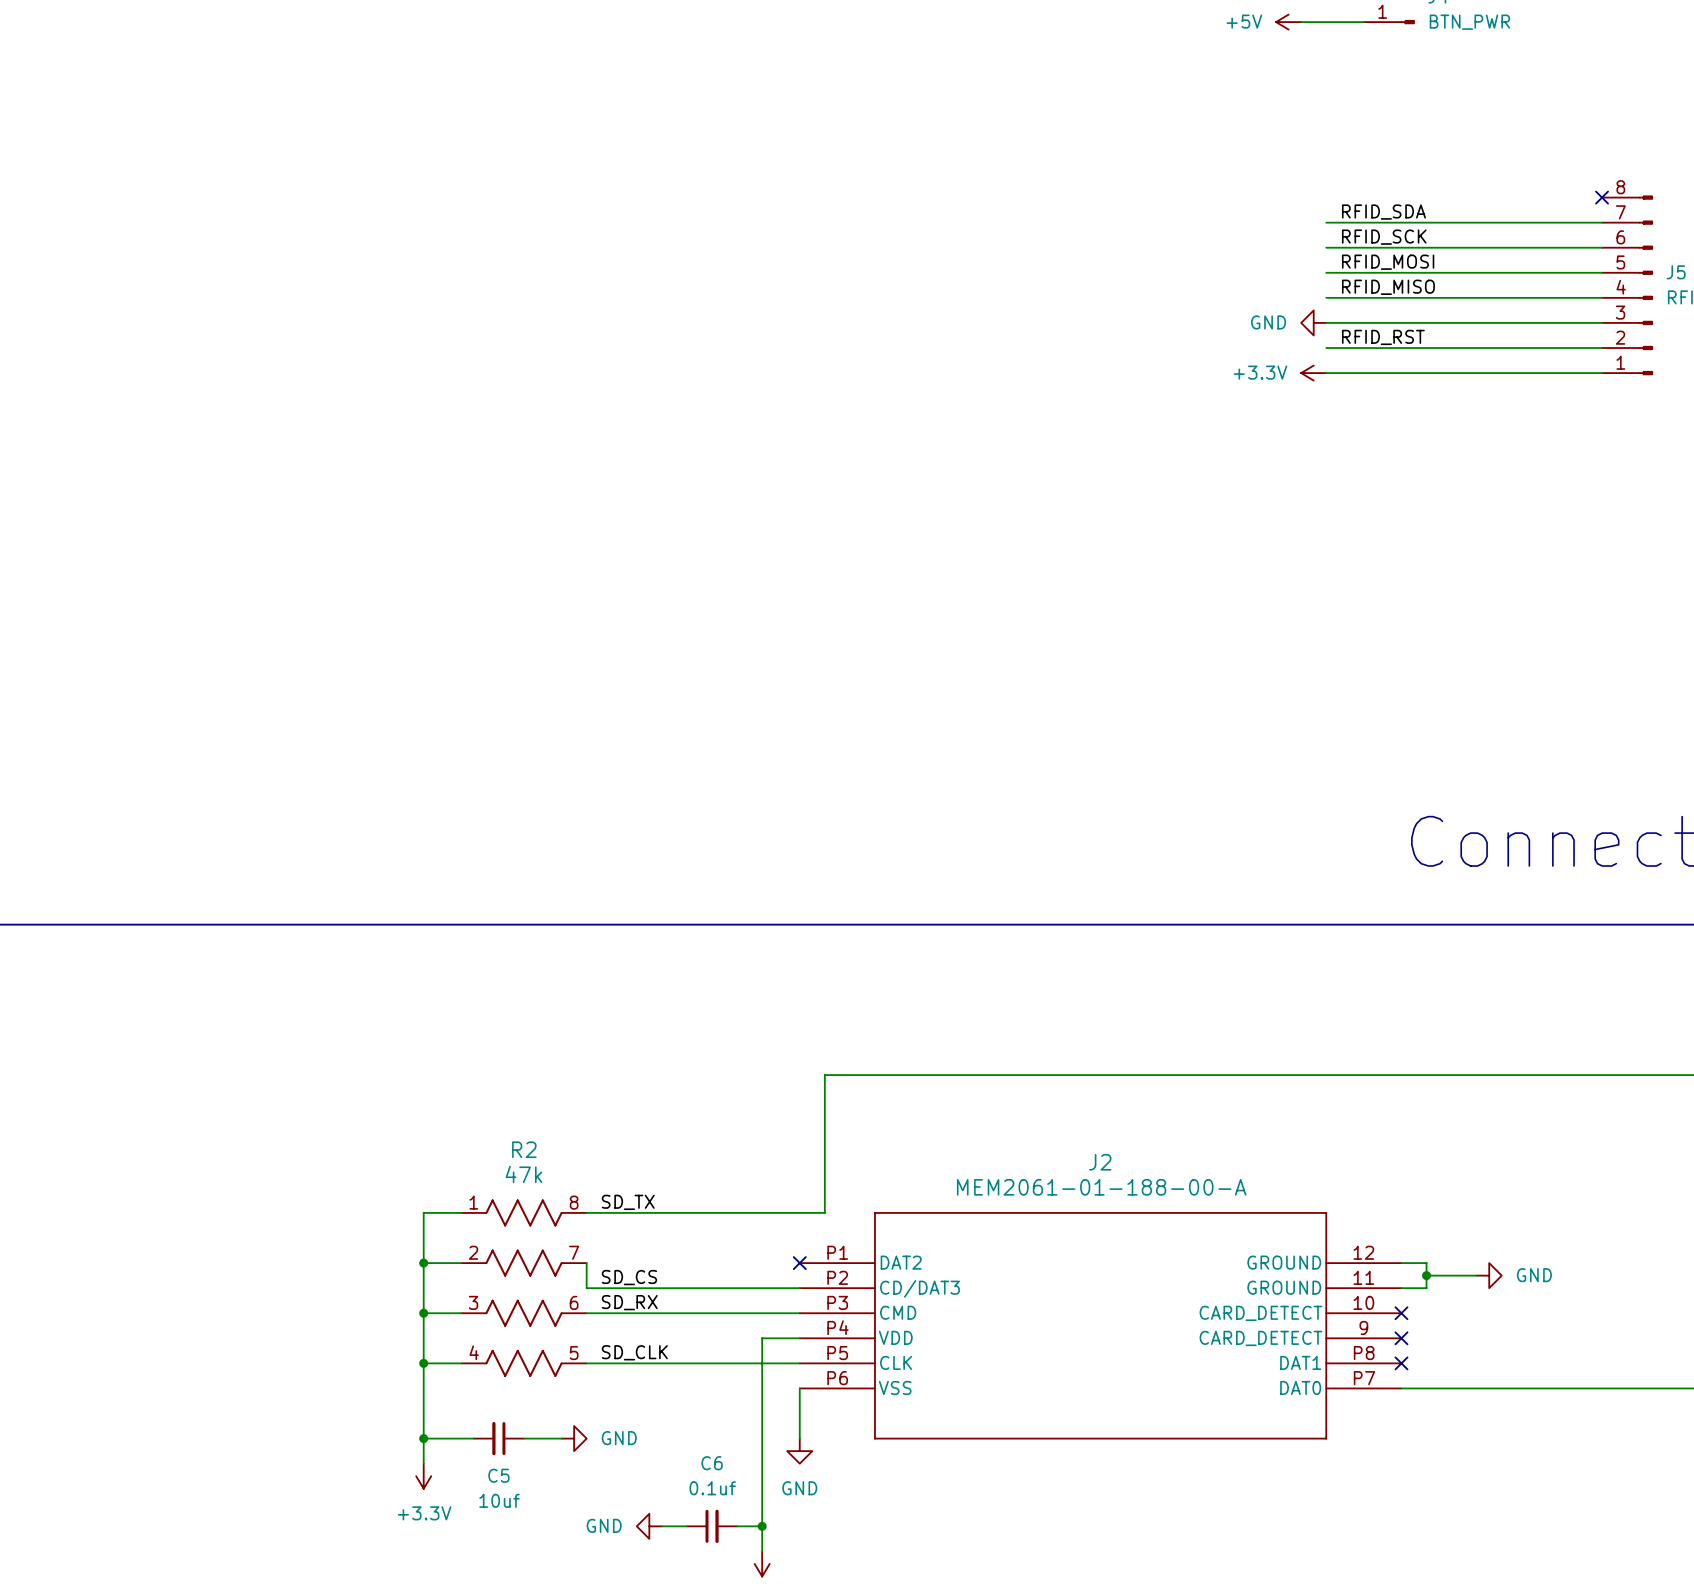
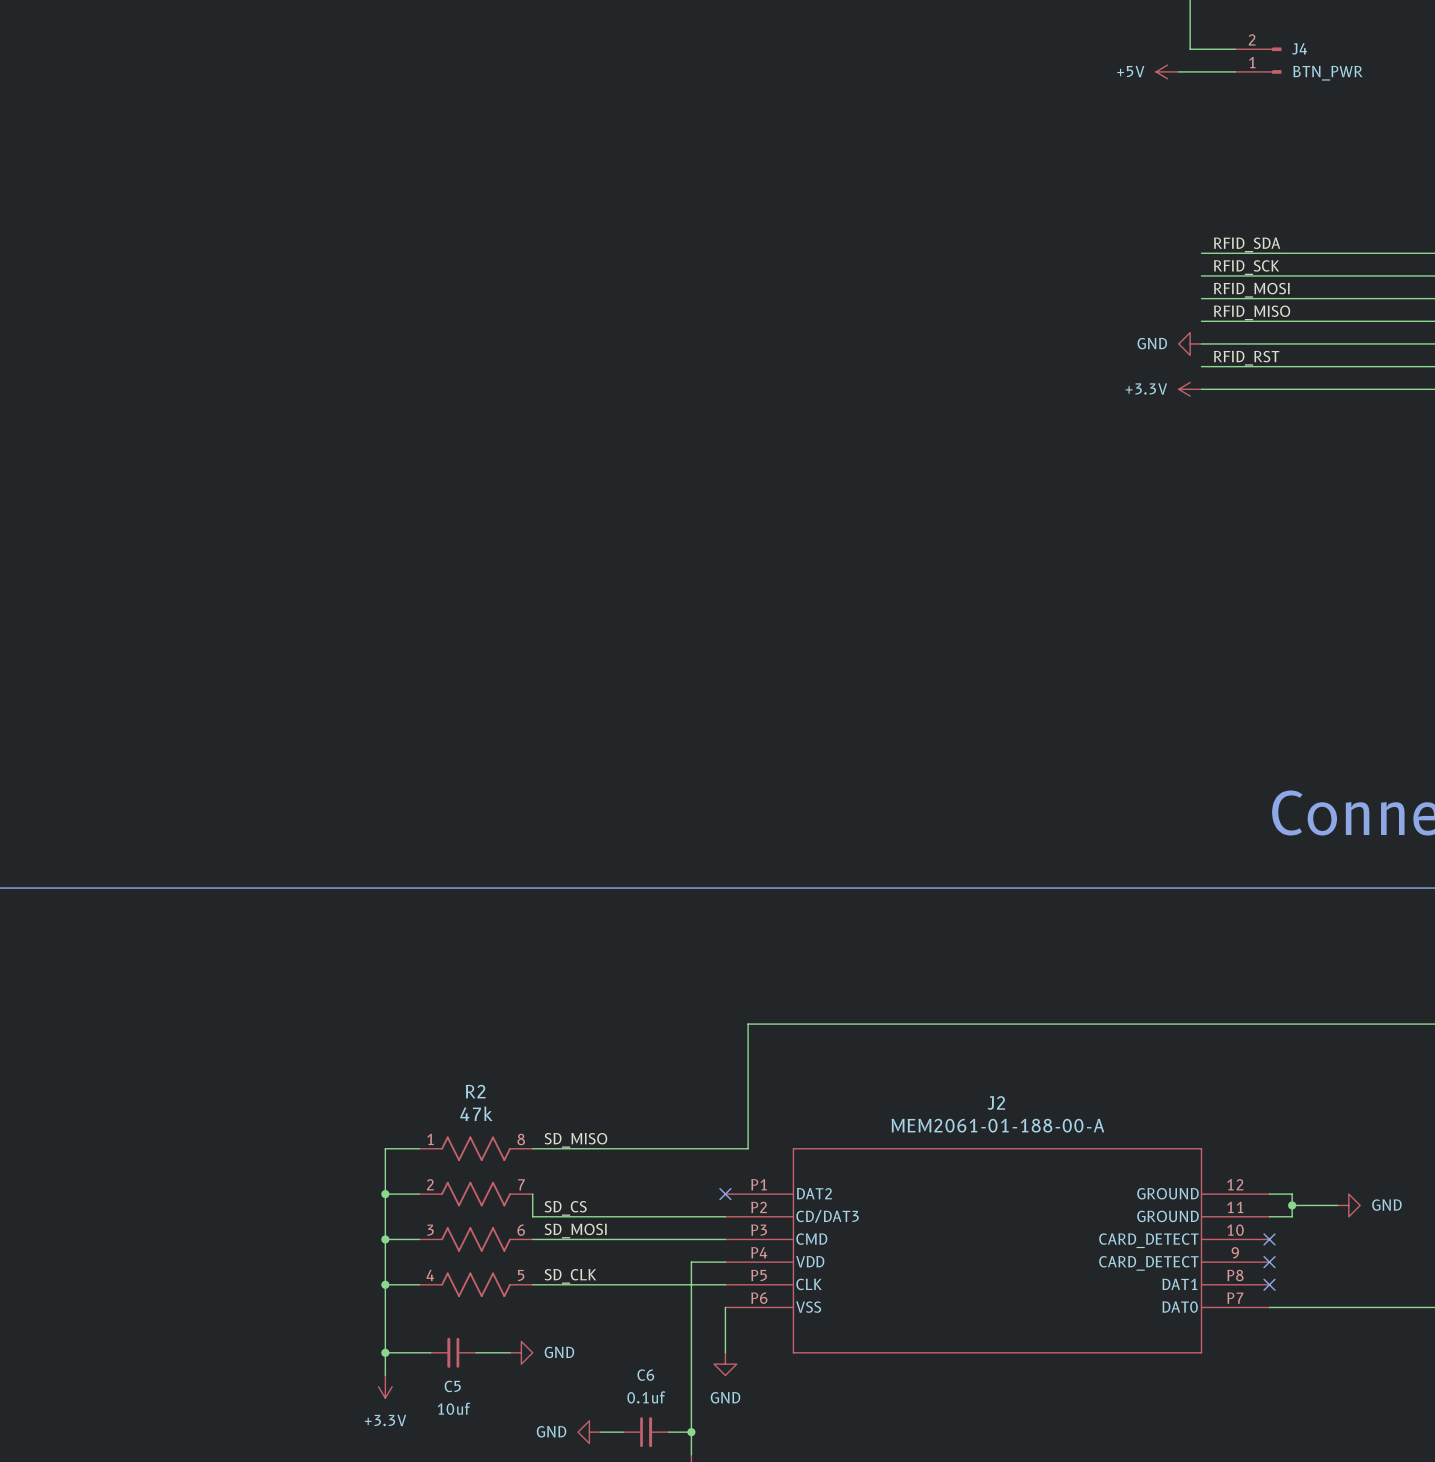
label: SD_TX (628, 1202) -> SD_MISO (575, 1140)
label: SD_RX (629, 1302) -> SD_MOSI (575, 1231)

